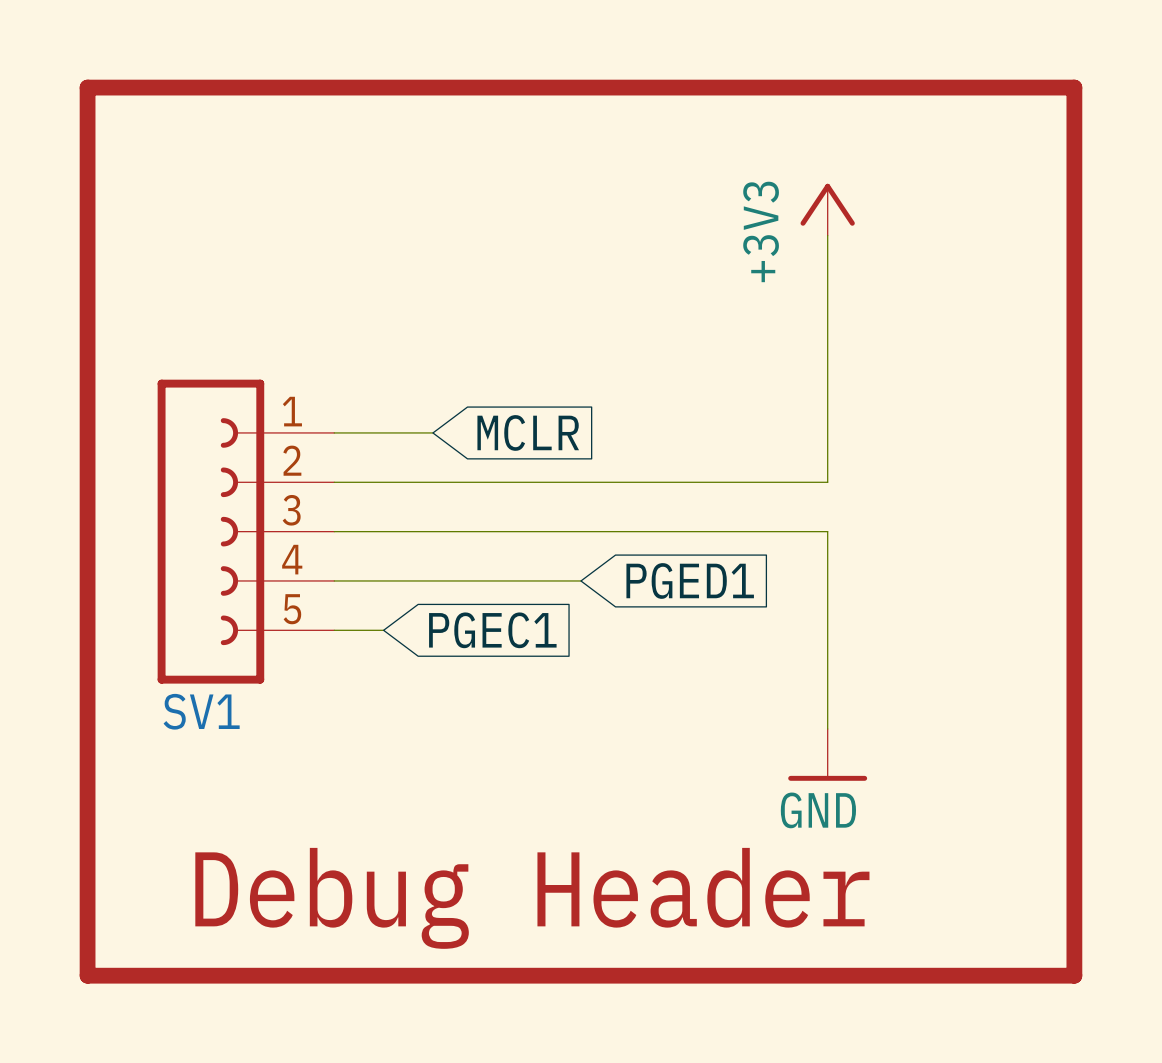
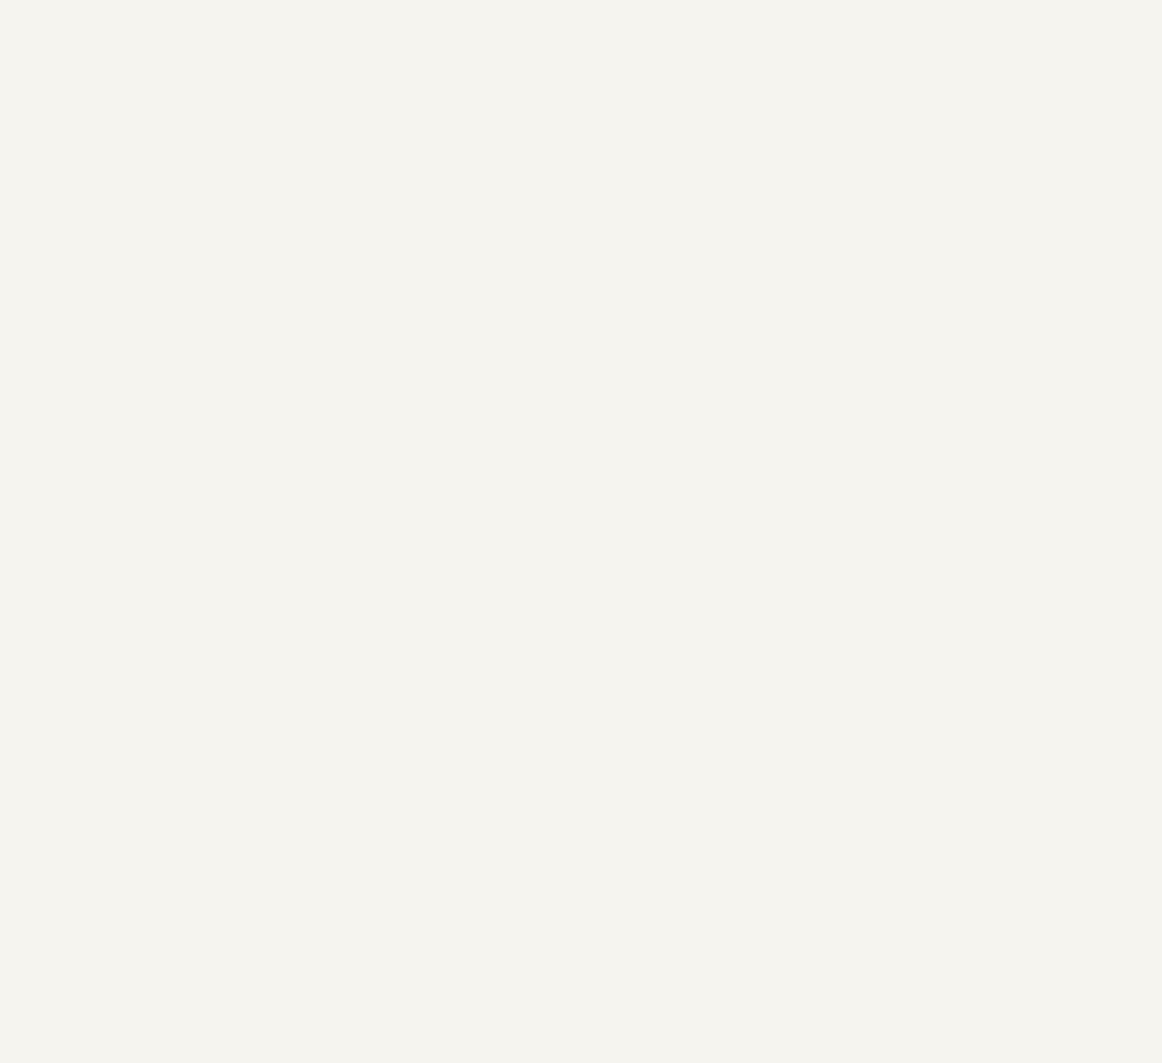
line: (87, 87) (1074, 87) (1074, 975) (87, 975) (87, 87) -> none
power symbol: +3V3 (827, 209) -> none
wire: (827, 235) (827, 482) (334, 482) -> none
wire: (334, 432) (432, 432) -> none
global label: MCLR (528, 432) -> none
SV1: (245, 531) -> none
wire: (334, 531) (827, 531) (827, 729) -> none
wire: (334, 580) (580, 580) -> none
global label: PGED1 (690, 580) -> none
wire: (334, 630) (383, 630) -> none
global label: PGEC1 (492, 630) -> none
power symbol: GND (827, 754) -> none
text: Debug Header (532, 898) -> none

